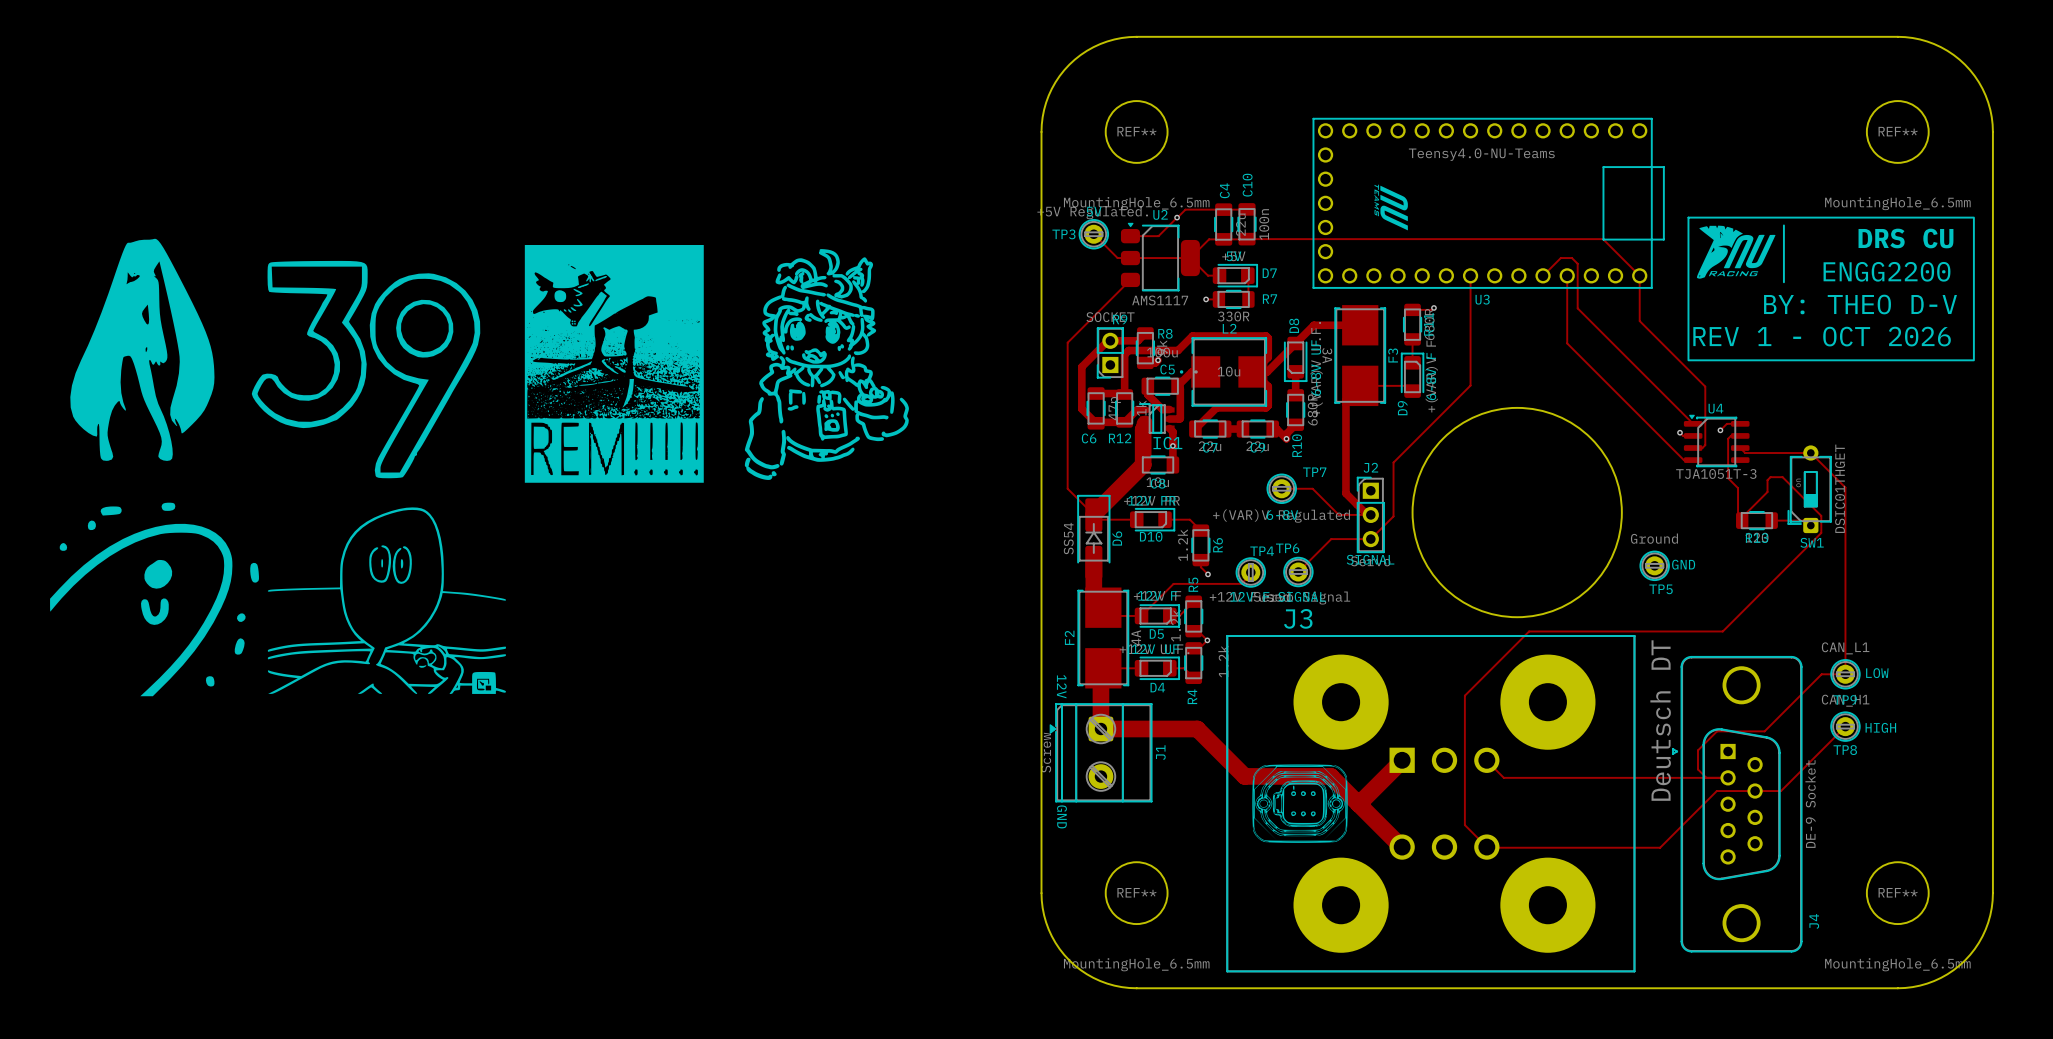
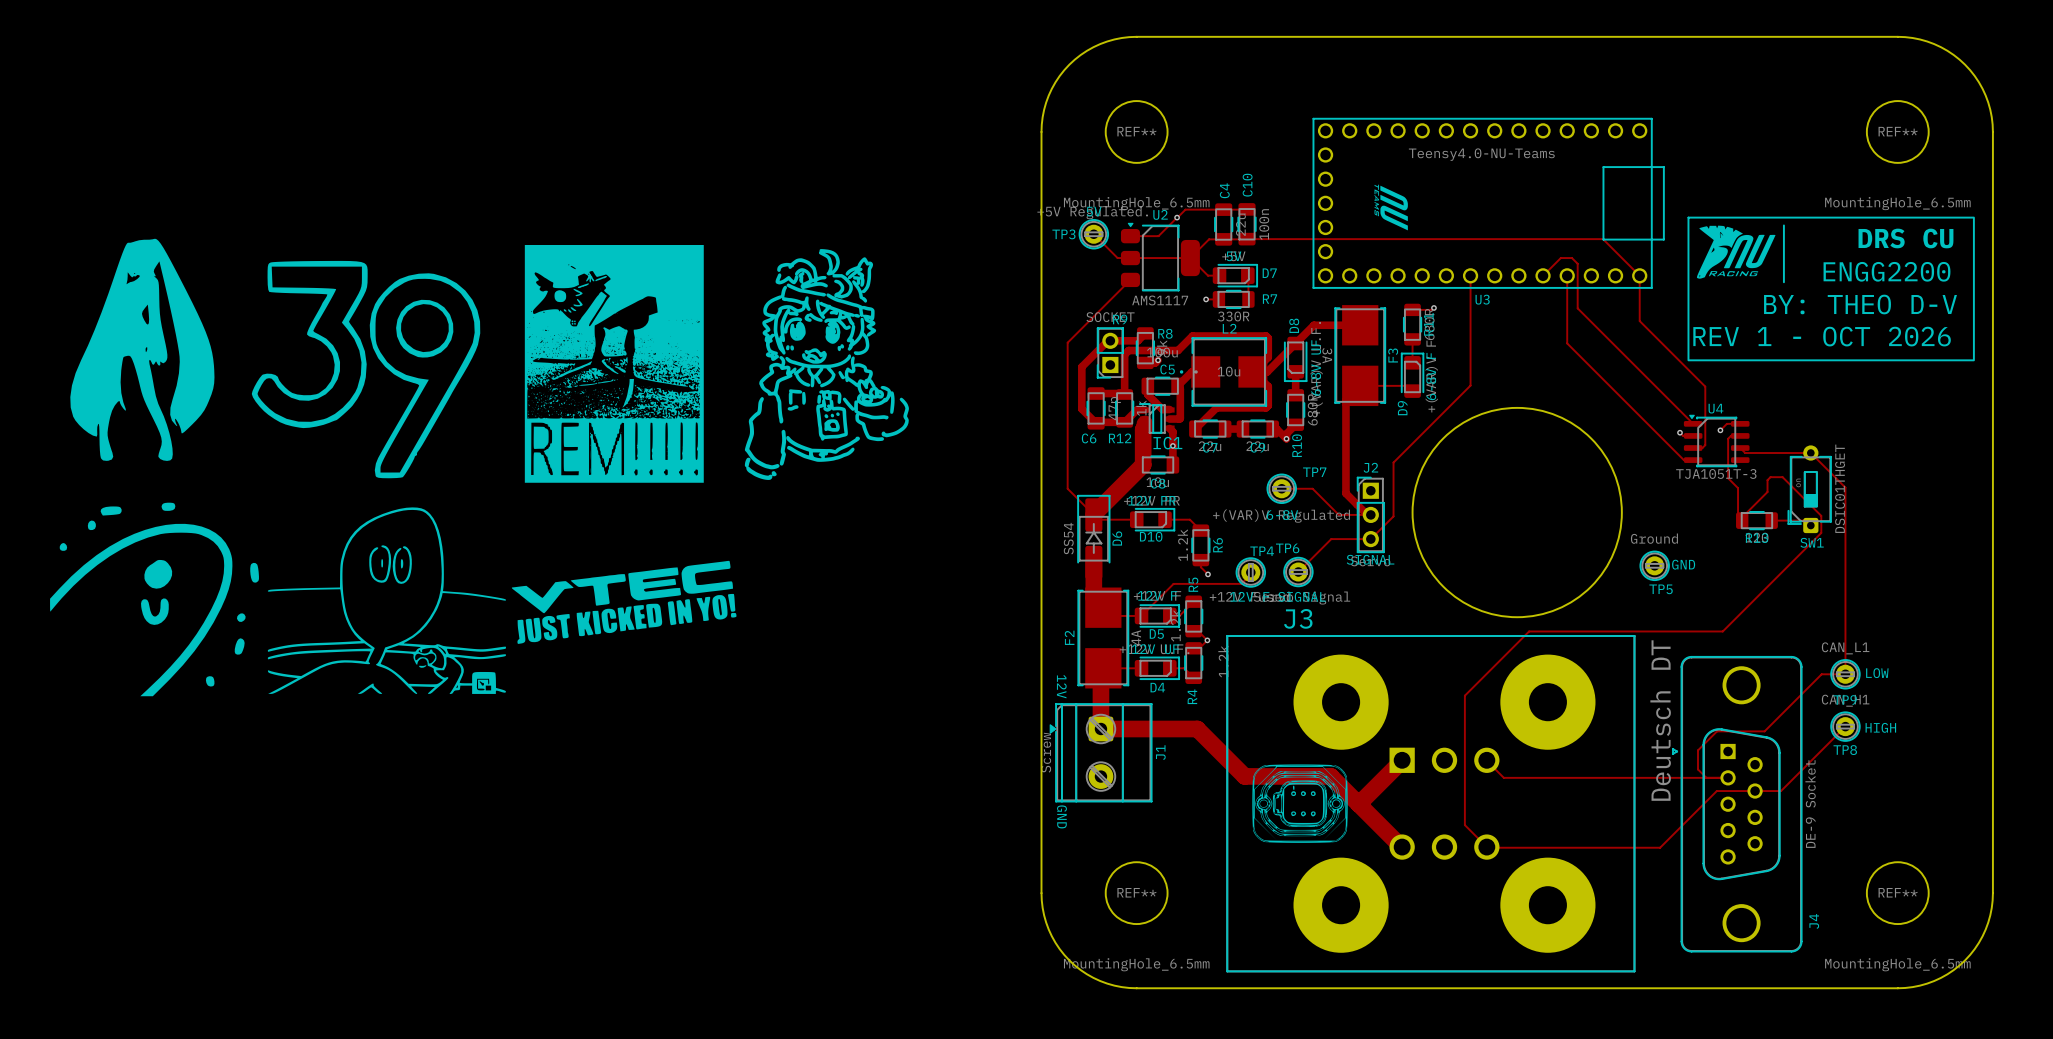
drawing: none -> [511, 560, 737, 644]

